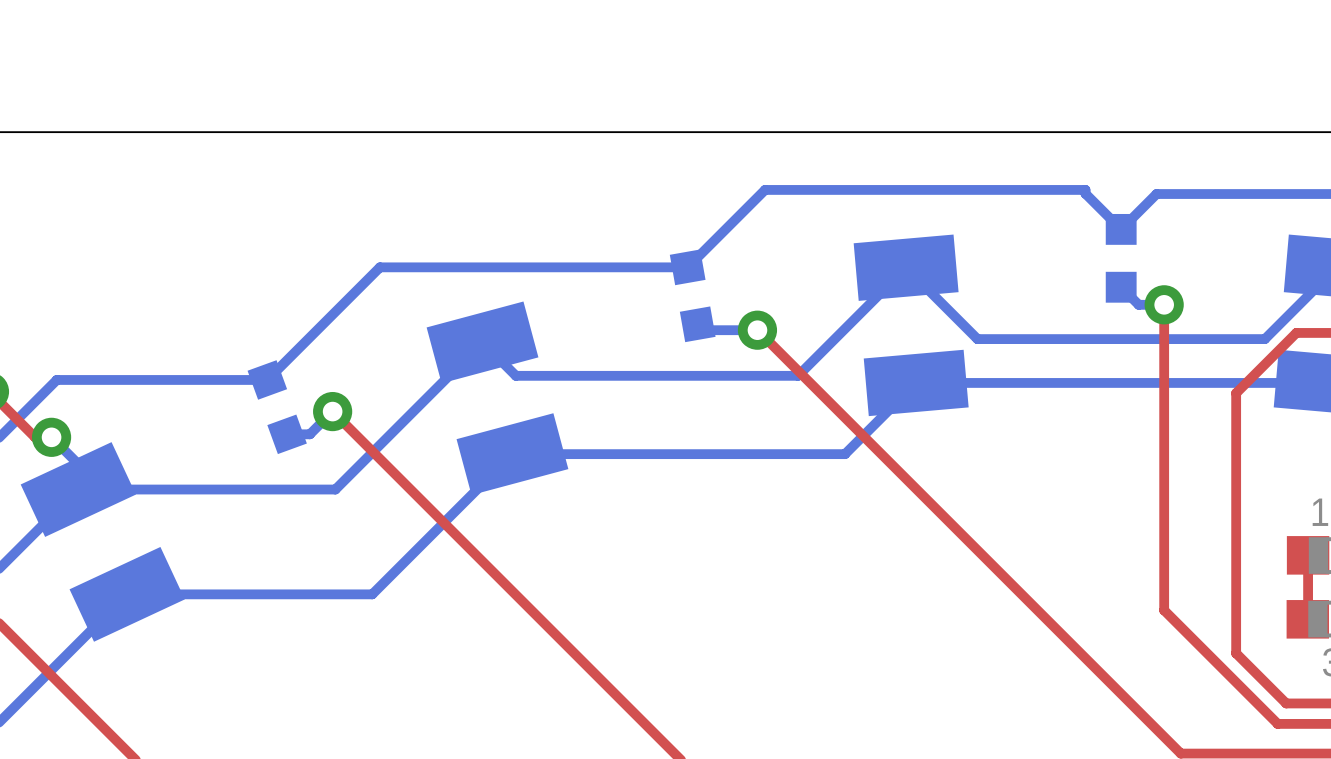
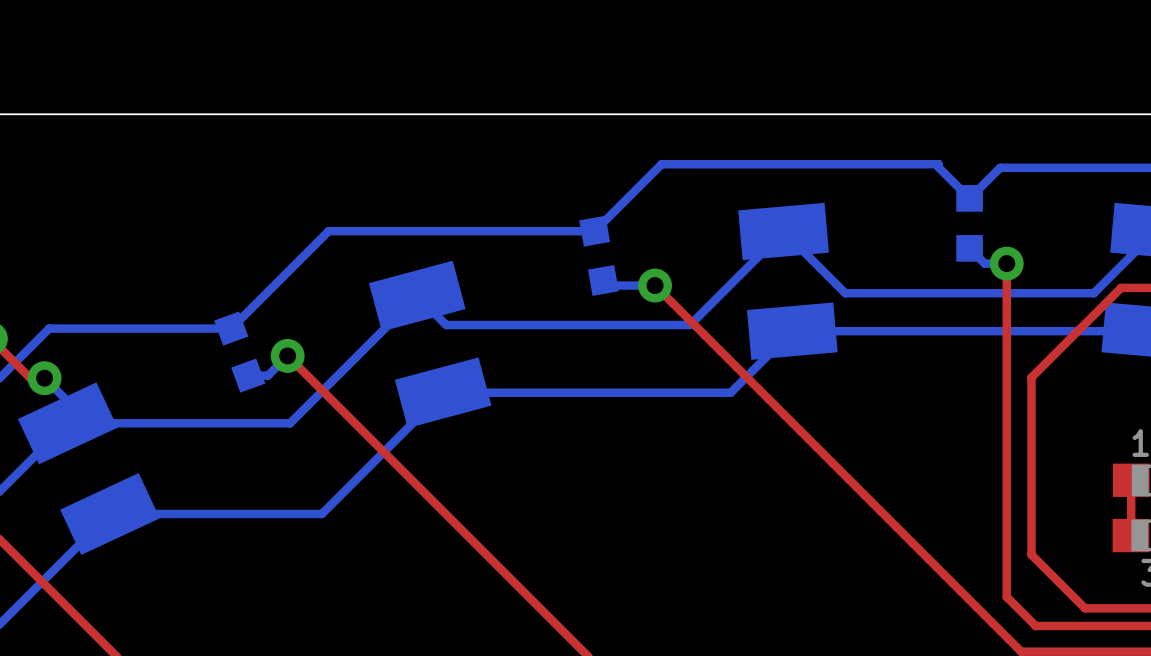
top track: (1236, 393) (1236, 653) (1286, 703) -> (1069, 340) (1031, 377) (1031, 554) (1085, 608) (1112, 608)
top track: (1164, 610) (1277, 723) -> (1006, 527) (1006, 596) (1035, 626) (1104, 626)

